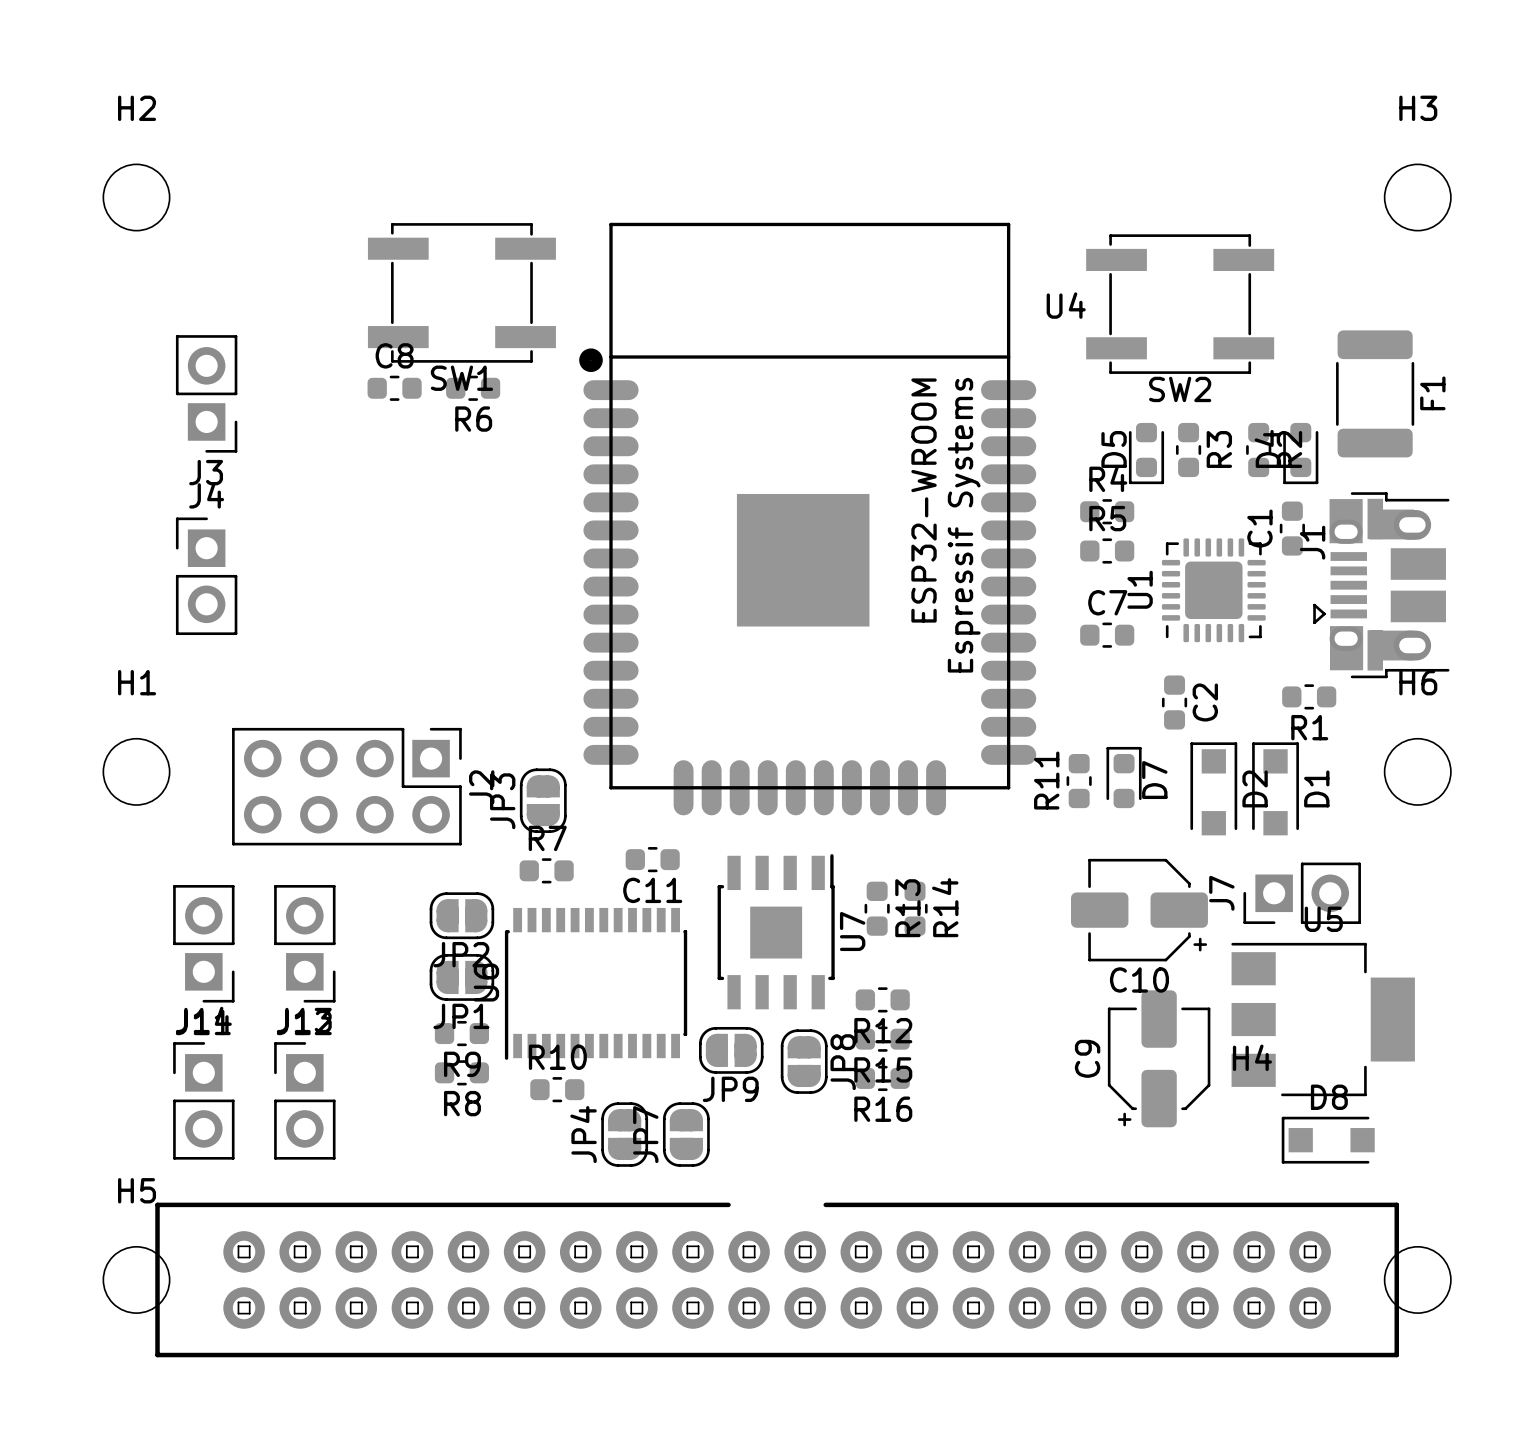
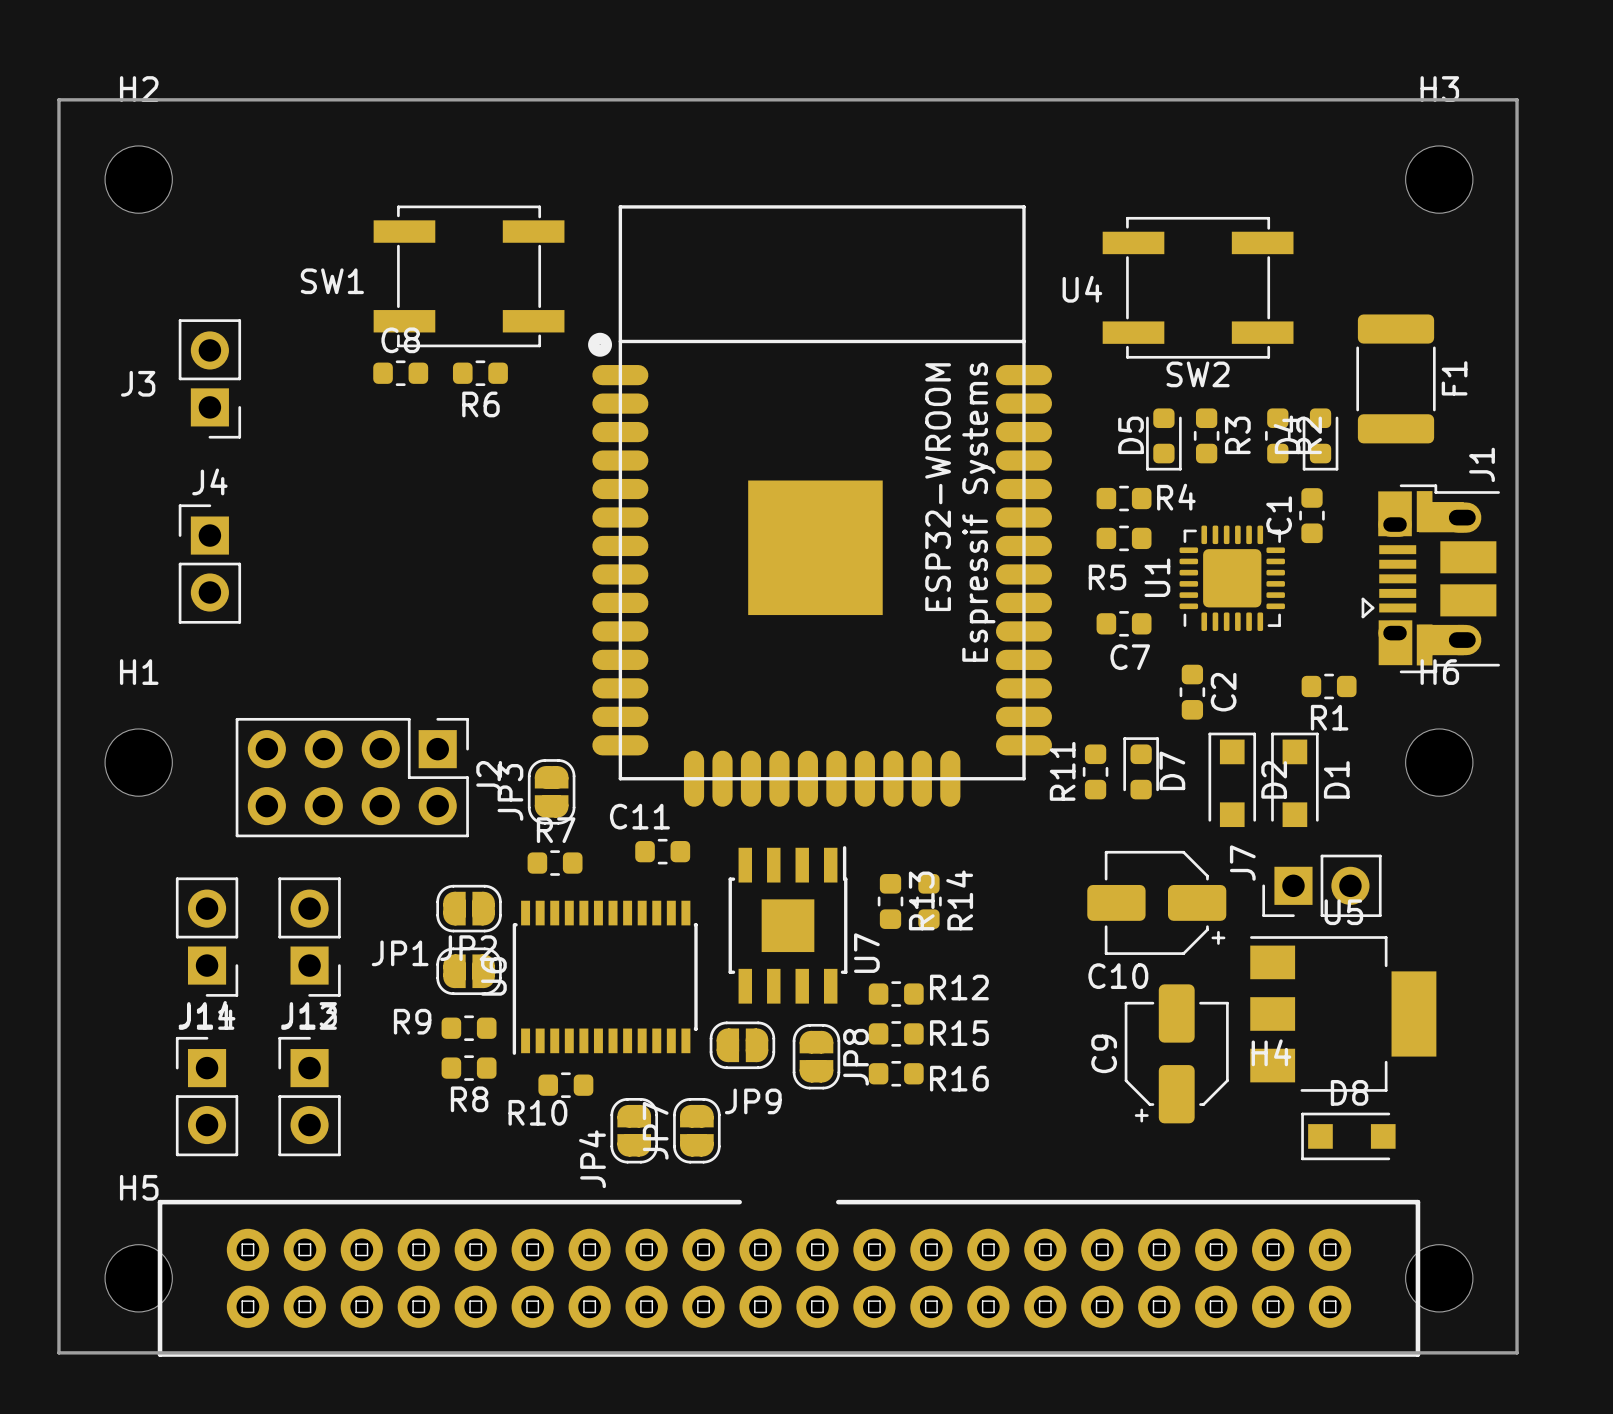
board edge: none -> (58, 99) (1517, 99) (1517, 1352) (58, 1352) (58, 99)
SW1 name position: SW1 (461, 378) -> SW1 (332, 281)
J3 name position: J3 (206, 472) -> J3 (138, 383)
R4 name position: R4 (1108, 478) -> R4 (1176, 497)
R5 name position: R5 (1107, 518) -> R5 (1107, 577)
J1 name position: J1 (1312, 542) -> J1 (1482, 464)
J1 position: (1381, 585) -> (1430, 578)
C7 name position: C7 (1107, 602) -> C7 (1130, 657)
C11 name position: C11 (652, 890) -> C11 (639, 816)
J7 name position: J7 (1221, 893) -> J7 (1242, 863)
U7 name position: U7 (852, 931) -> U7 (866, 953)
C10 name position: C10 (1139, 979) -> C10 (1118, 976)
JP1 name position: JP1 (461, 1016) -> JP1 (400, 953)
R12 name position: R12 (883, 1030) -> R12 (959, 987)
R10 name position: R10 (557, 1057) -> R10 (537, 1112)
R9 name position: R9 (462, 1064) -> R9 (412, 1021)
R15 name position: R15 (883, 1069) -> R15 (959, 1033)
JP9 name position: JP9 (730, 1089) -> JP9 (753, 1101)
R16 name position: R16 (883, 1109) -> R16 (959, 1078)
JP4 name position: JP4 (583, 1134) -> JP4 (592, 1159)

